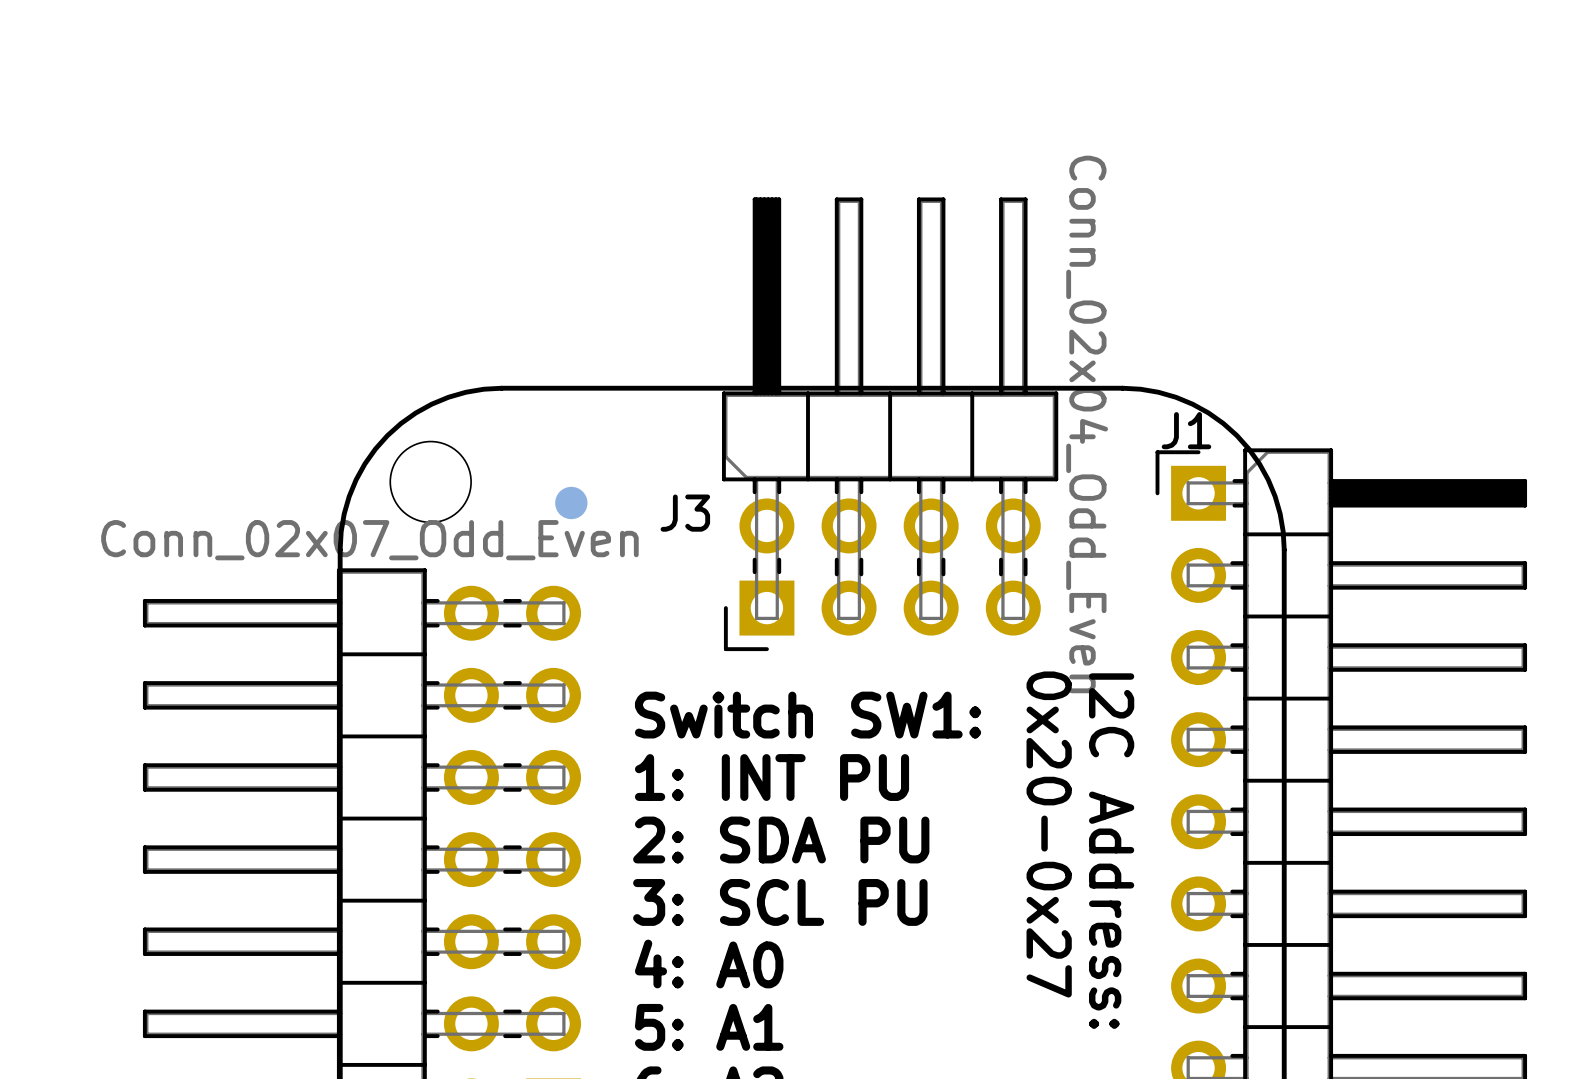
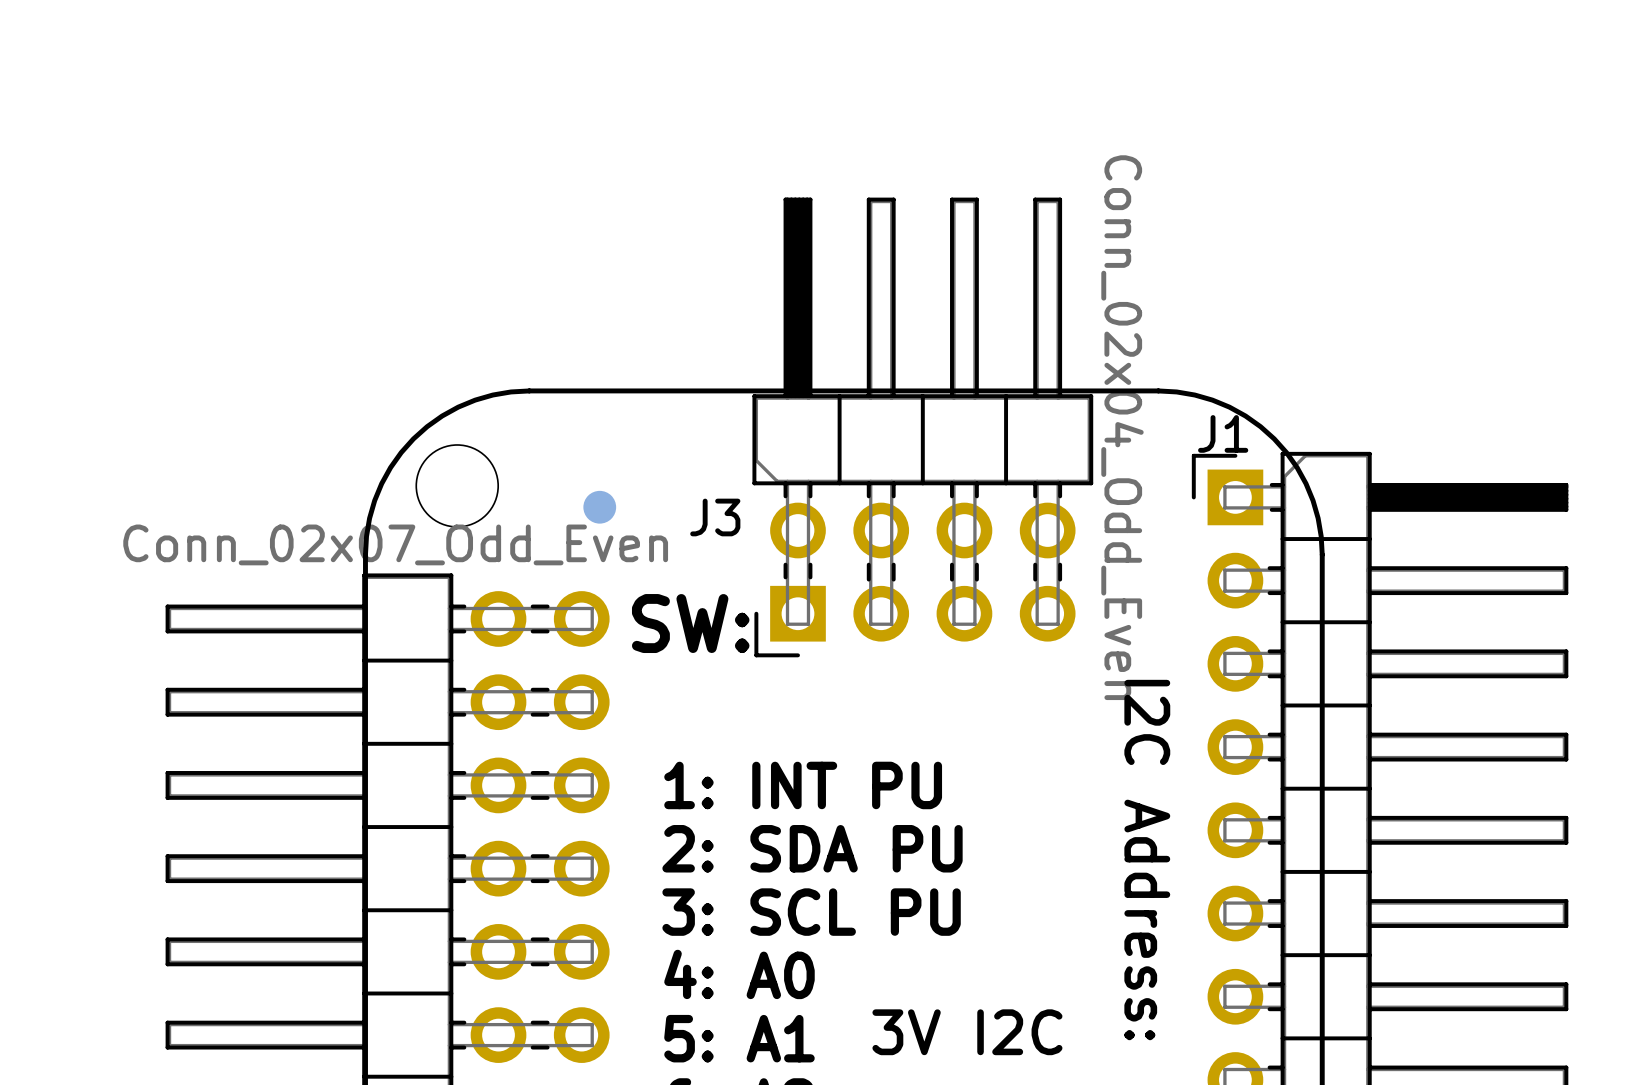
text: none -> SW: (690, 623)
text: Switch SW1: (808, 715) -> none
text: 0x20-0x27 (1049, 834) -> none
text: none -> 3V I2C (967, 1032)

